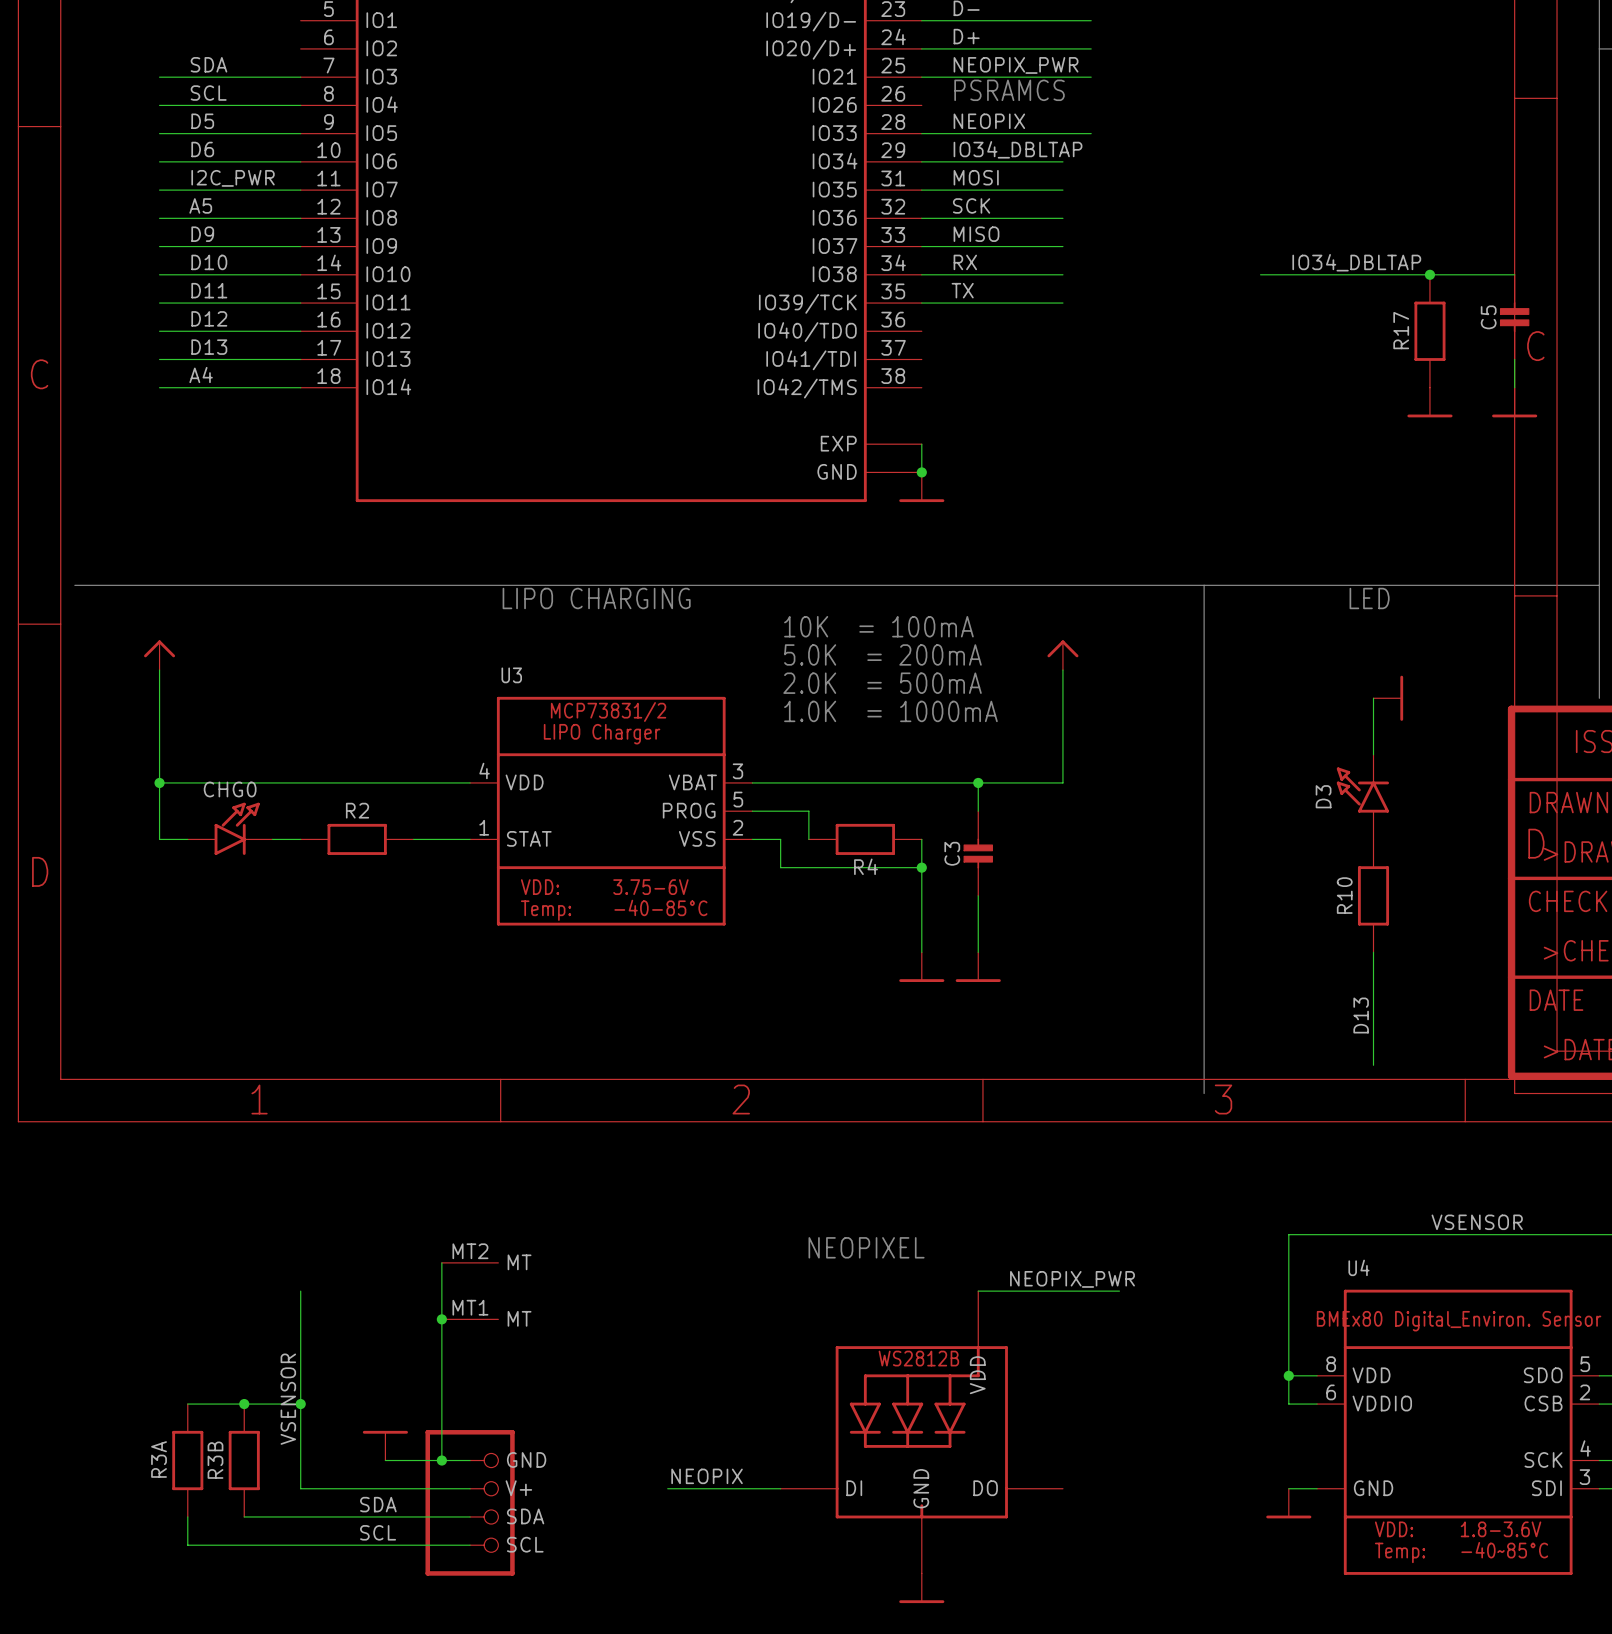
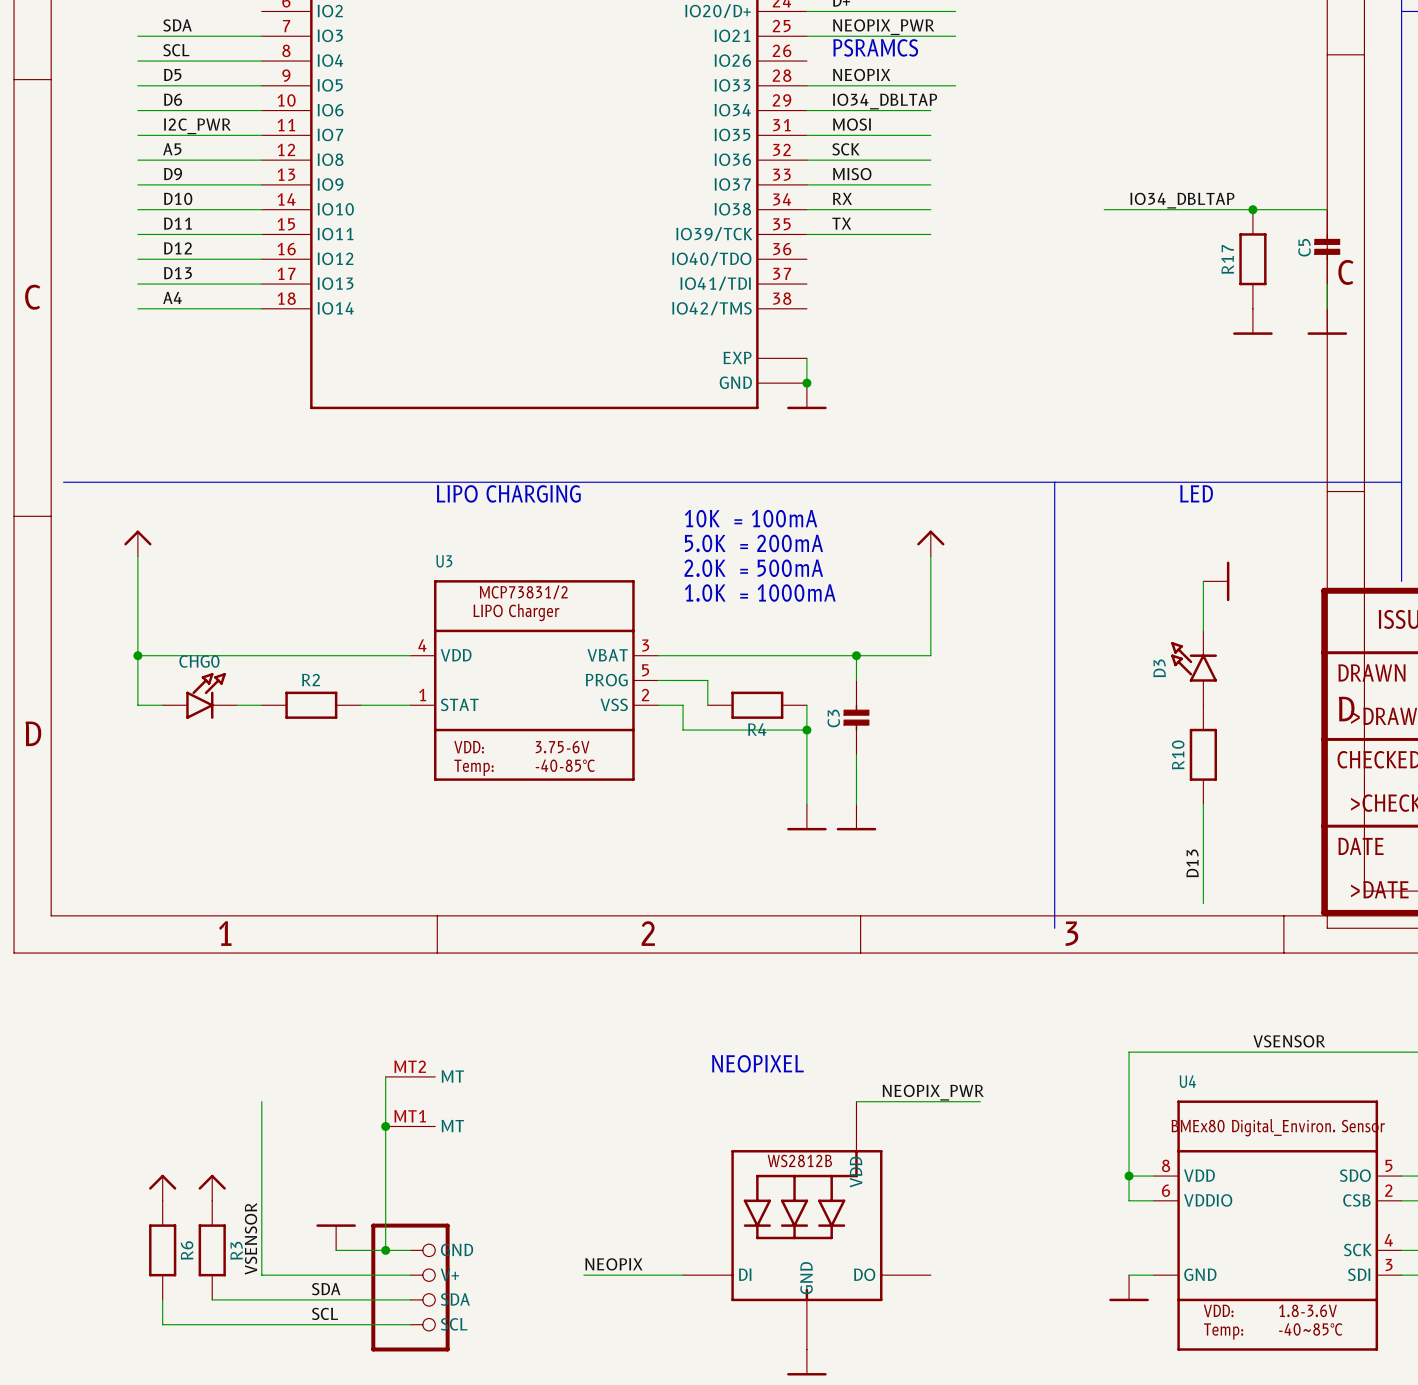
power symbol: none -> (162, 1187)
power symbol: none -> (212, 1187)
label position: VSENSOR (288, 1399) -> VSENSOR (251, 1238)
wire: (187, 1404) (300, 1404) -> none
junction: (244, 1404) -> none
junction: (300, 1404) -> none
R3A name: R3A (159, 1459) -> R6 (187, 1250)
R3B name: R3B (215, 1460) -> R3 (236, 1250)

